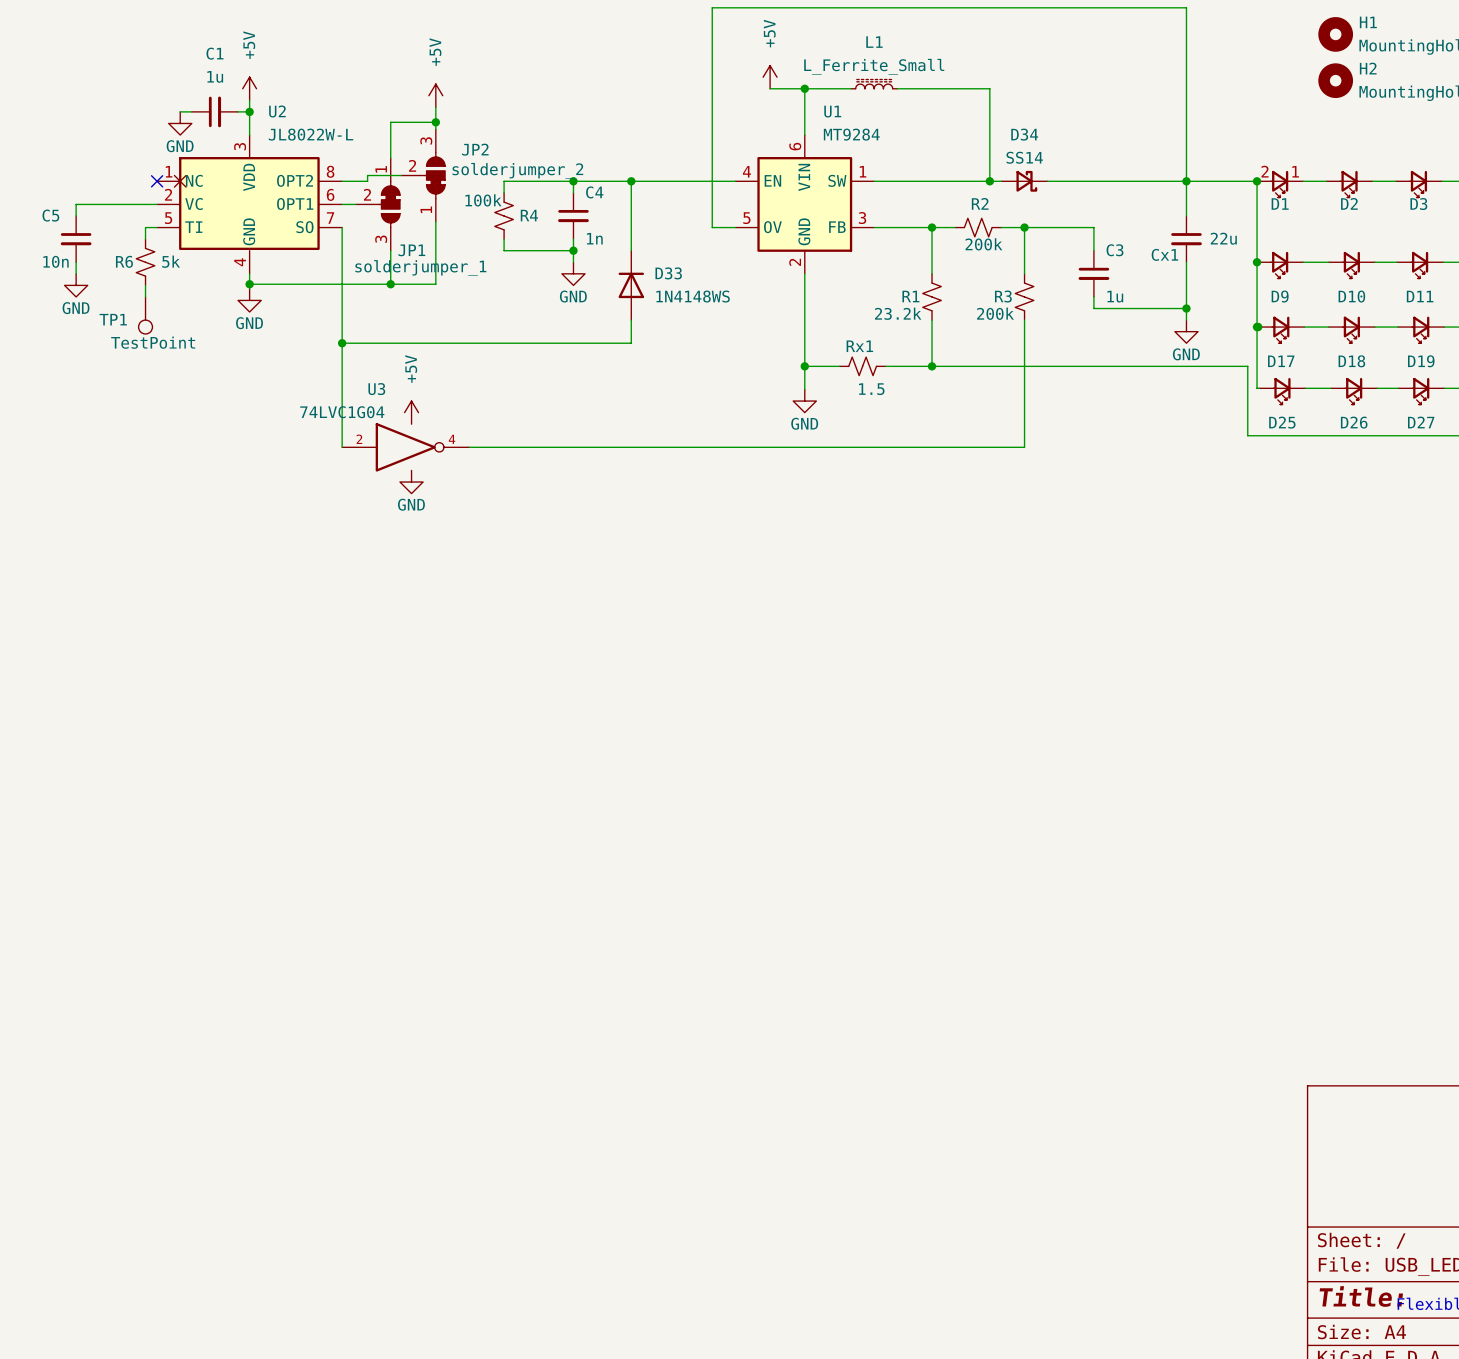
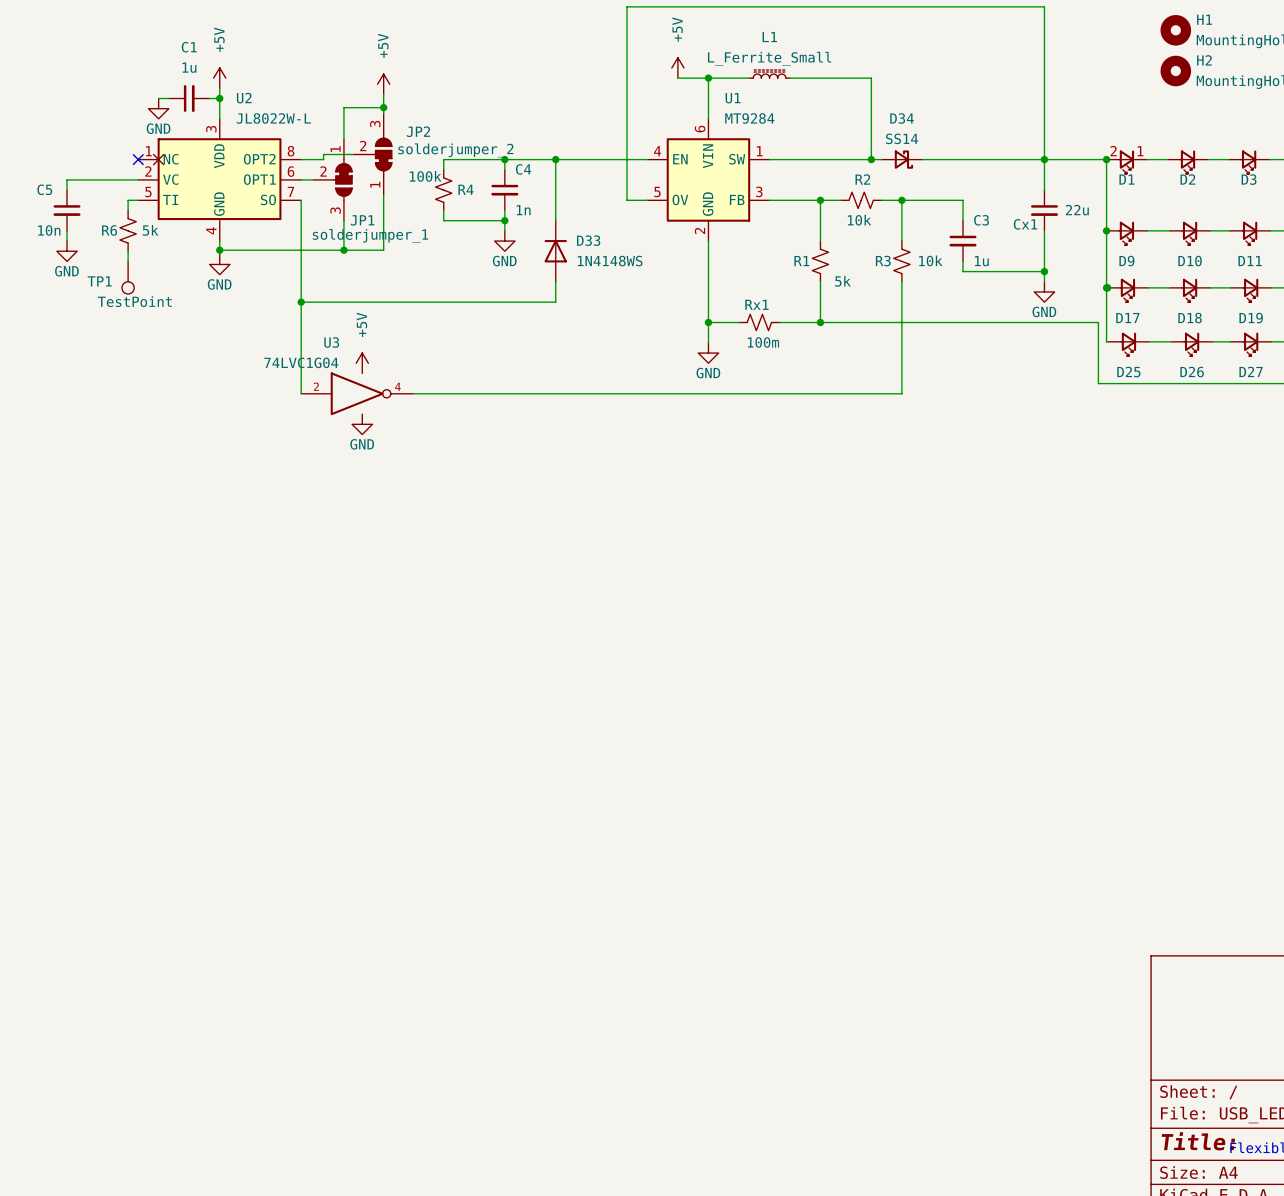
R2 value: 200k (983, 244) -> 10k (859, 220)
R1 value: 23.2k (898, 313) -> 5k (842, 281)
R3 value: 200k (995, 313) -> 10k (930, 260)
Rx1 value: 1.5 (871, 389) -> 100m (763, 342)

